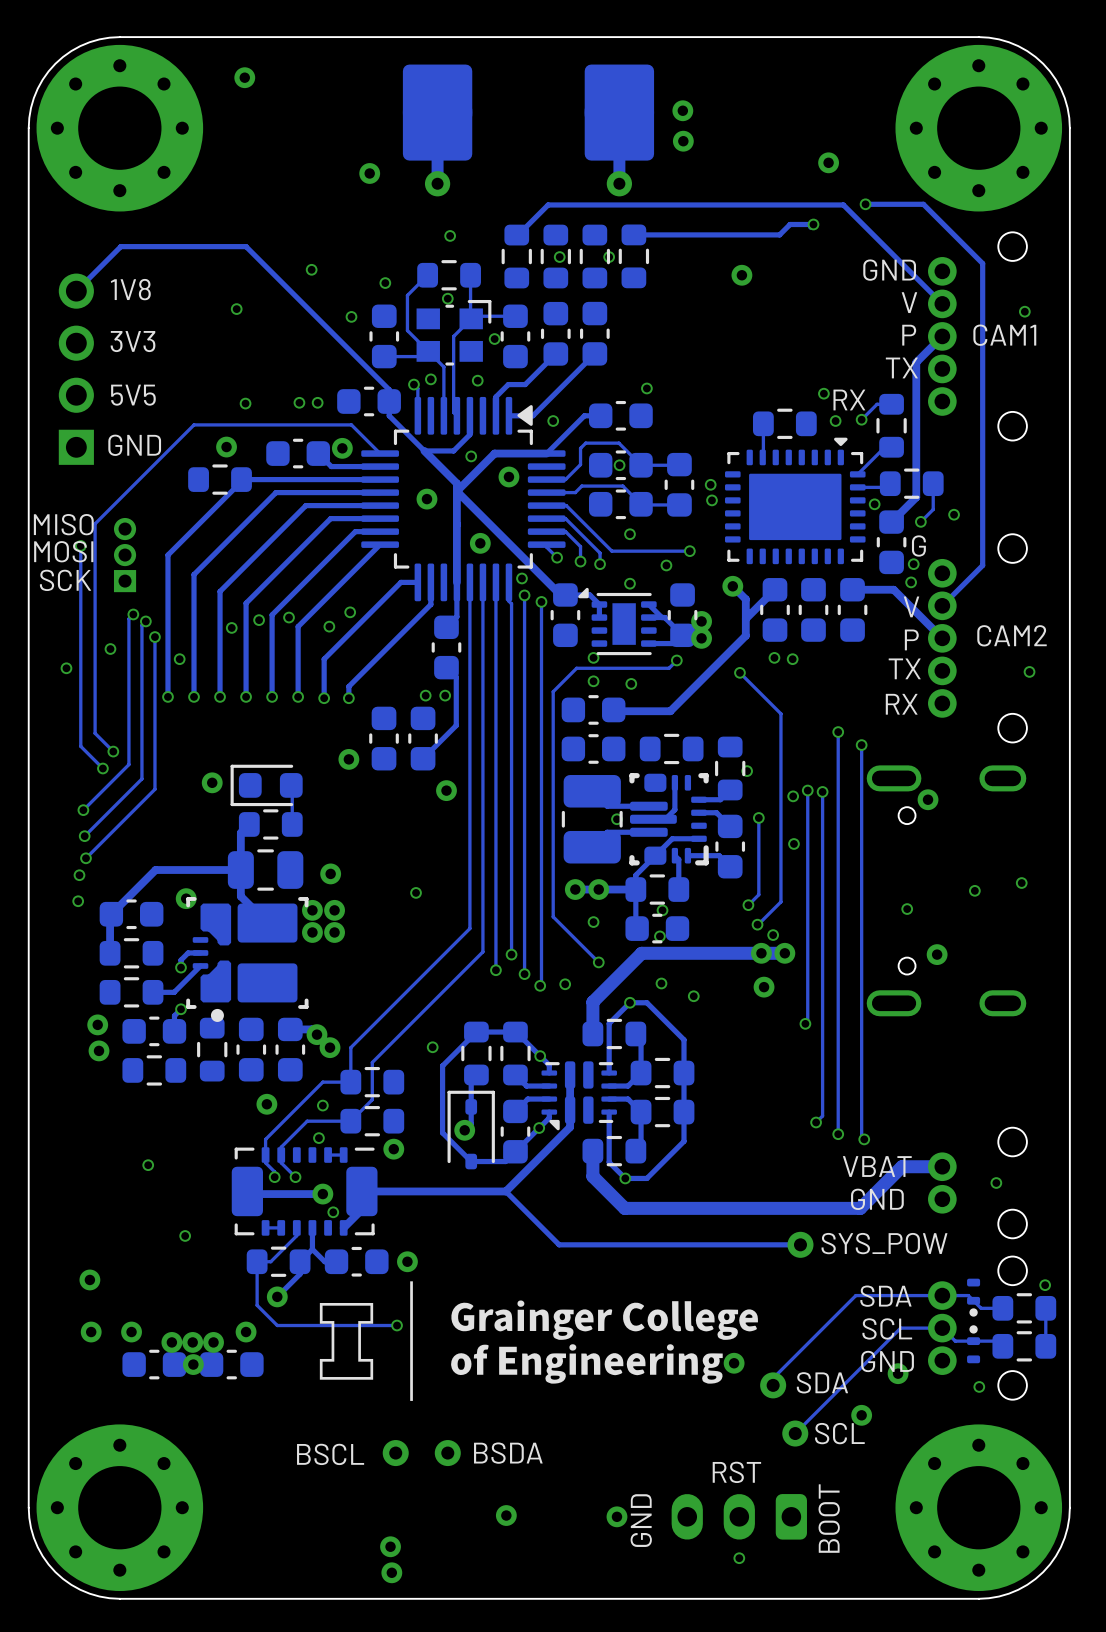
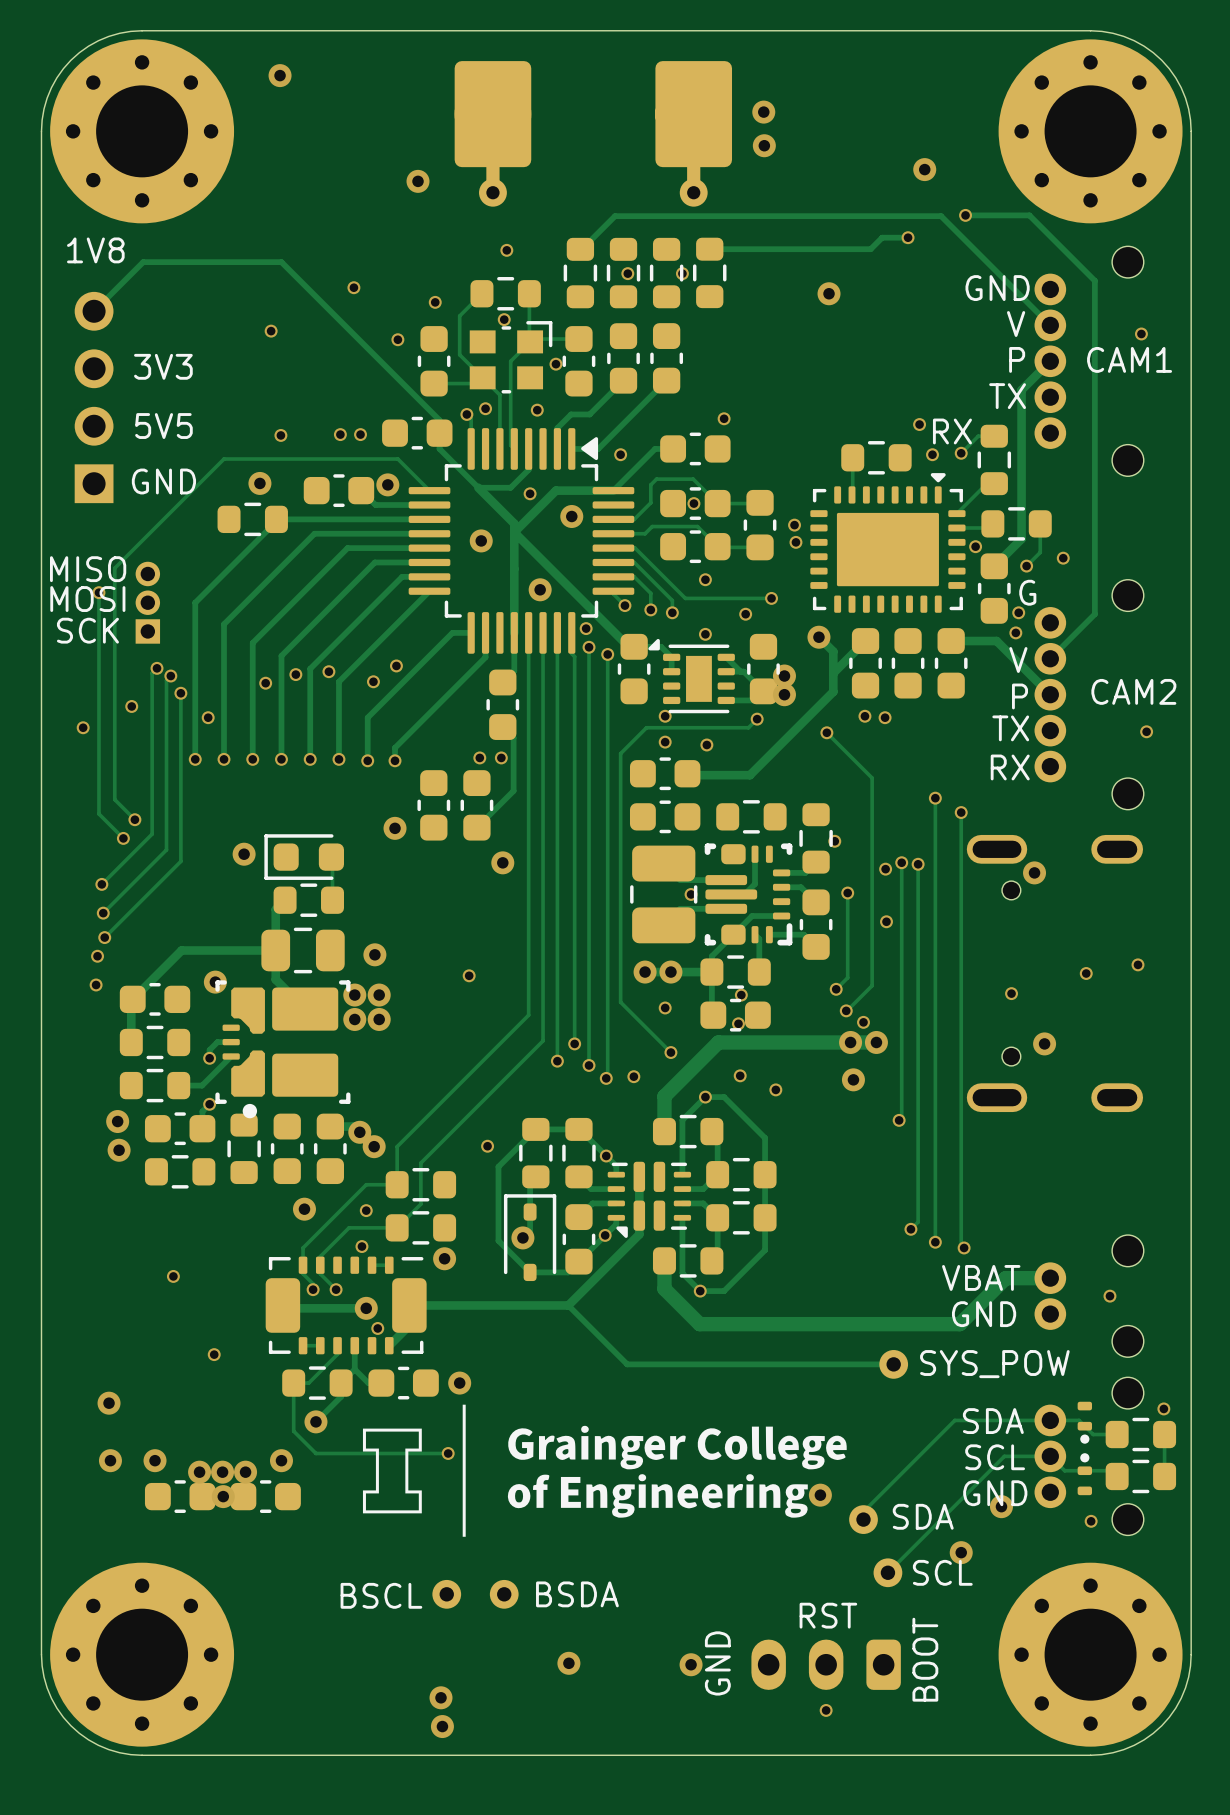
text position: 1V8 (130, 289) -> 1V8 (95, 250)

